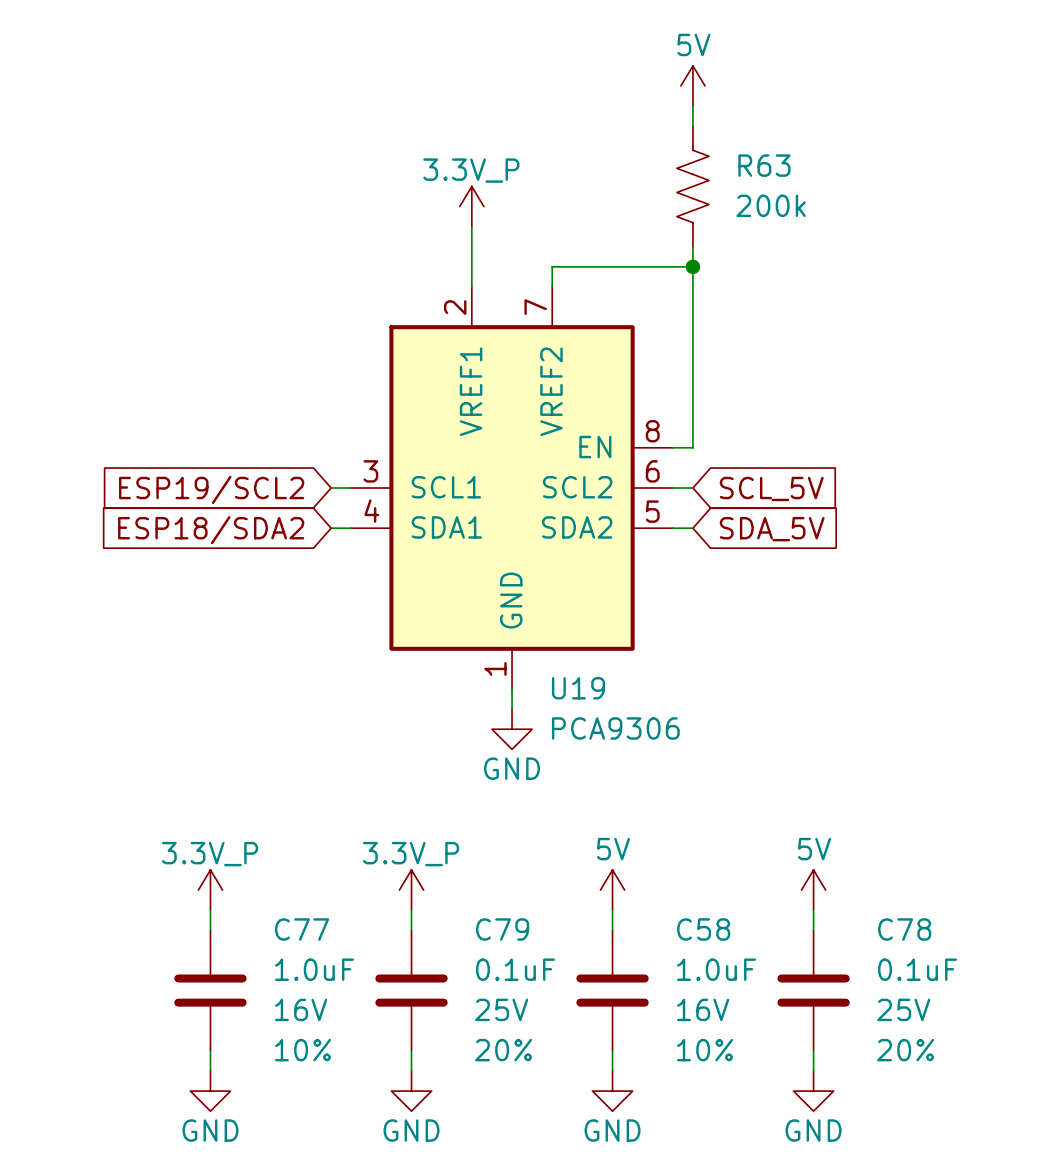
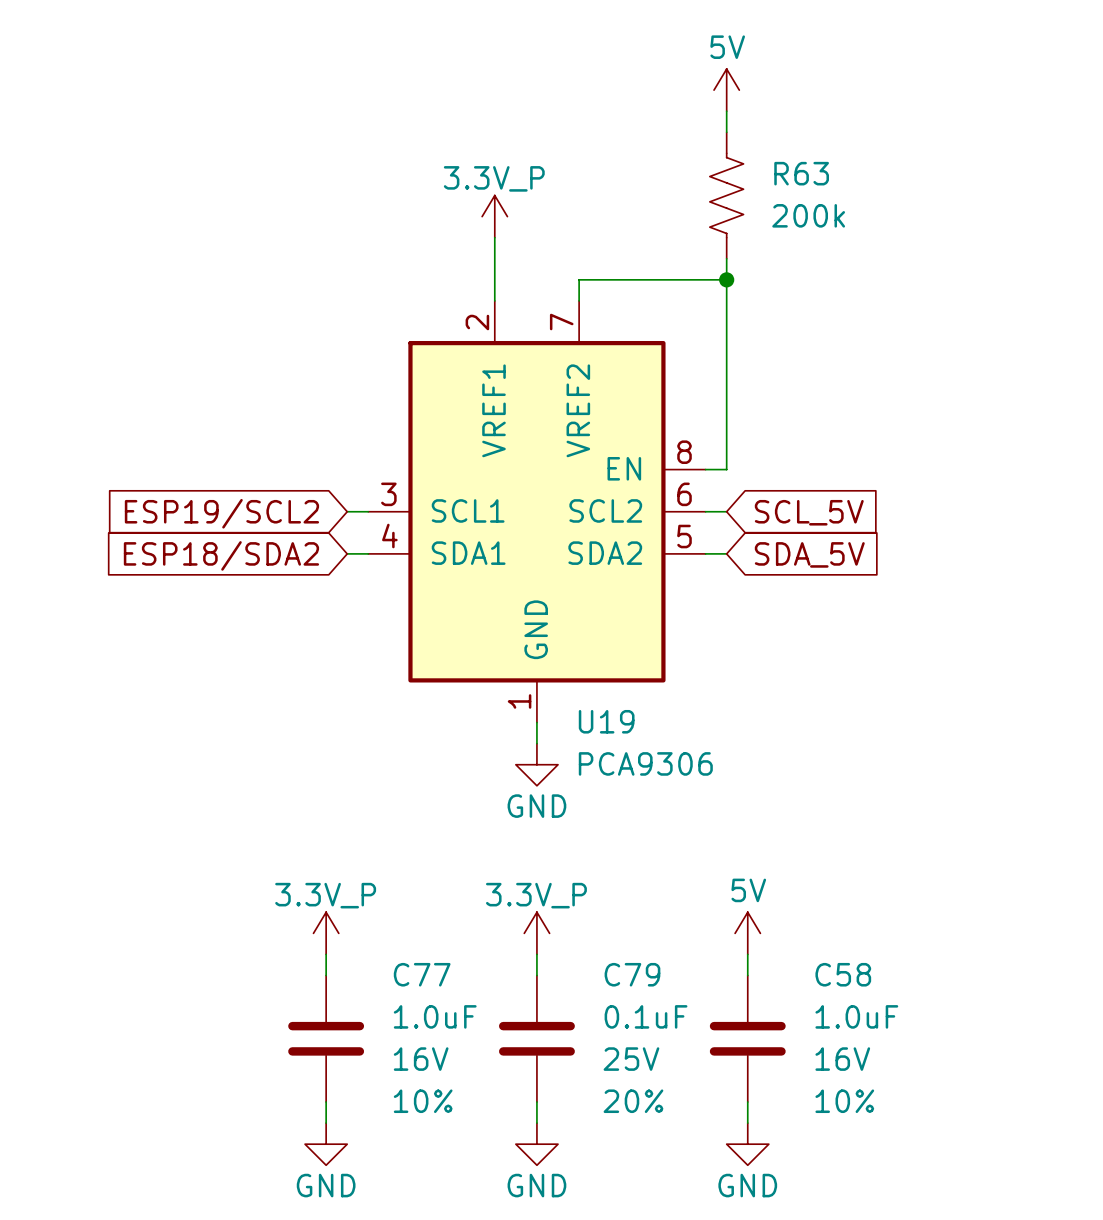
power symbol: 3.3V_P (210, 890) -> none
power symbol: none -> 3.3V_P (326, 933)
power symbol: 3.3V_P (411, 890) -> none
power symbol: none -> 3.3V_P (536, 933)
power symbol: 5V (612, 890) -> none
power symbol: none -> 5V (747, 933)
power symbol: 5V (813, 890) -> none
wire: (210, 910) (210, 930) -> none
wire: (411, 910) (411, 930) -> (326, 954) (326, 975)
wire: (612, 910) (612, 930) -> (536, 954) (536, 975)
wire: (813, 910) (813, 930) -> (747, 954) (747, 975)
C77 position: (210, 990) -> (326, 1038)
C79 position: (411, 990) -> (536, 1038)
C58 position: (612, 990) -> (747, 1038)
C78: 0.1uF (813, 990) -> none
wire: (210, 1050) (210, 1070) -> none
wire: (411, 1050) (411, 1070) -> (326, 1102) (326, 1123)
wire: (612, 1050) (612, 1070) -> (536, 1102) (536, 1123)
wire: (813, 1050) (813, 1070) -> (747, 1102) (747, 1123)
power symbol: GND (210, 1091) -> none
power symbol: none -> GND (326, 1144)
power symbol: GND (411, 1091) -> none
power symbol: none -> GND (536, 1144)
power symbol: GND (612, 1091) -> none
power symbol: none -> GND (747, 1144)
power symbol: GND (813, 1091) -> none

